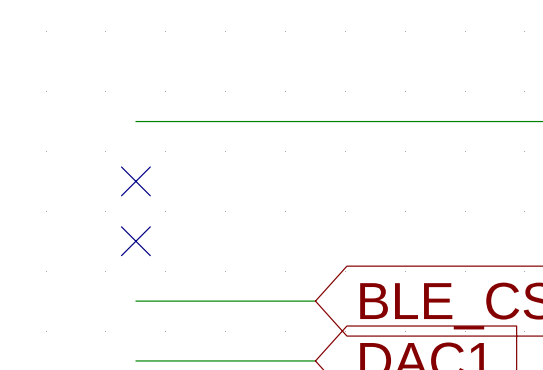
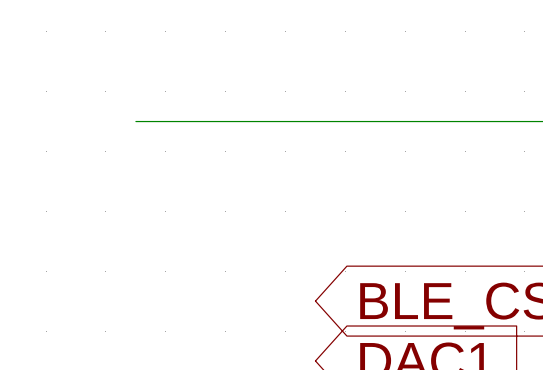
no-connect mark: (135, 181) -> none
no-connect mark: (135, 241) -> none
wire: (135, 301) (315, 301) -> none
wire: (135, 360) (315, 360) -> none

